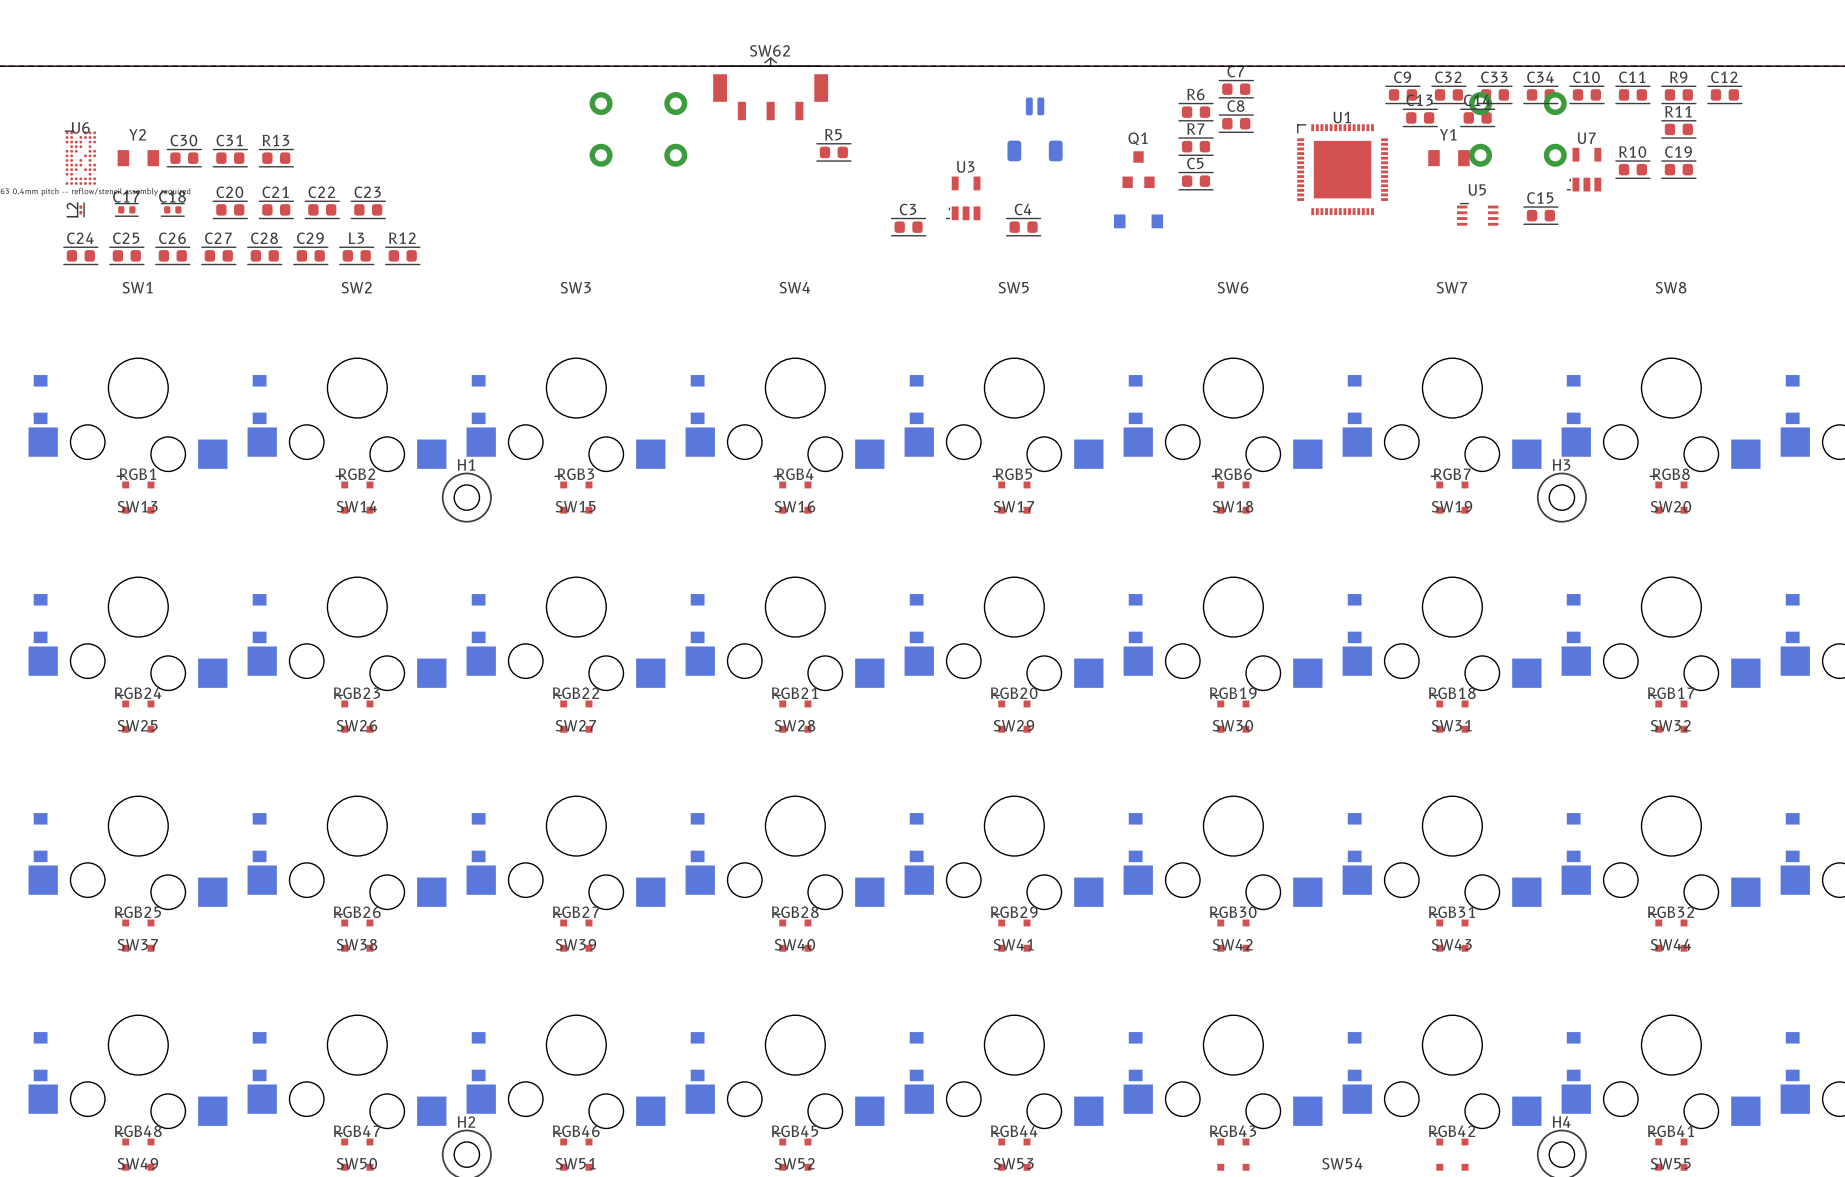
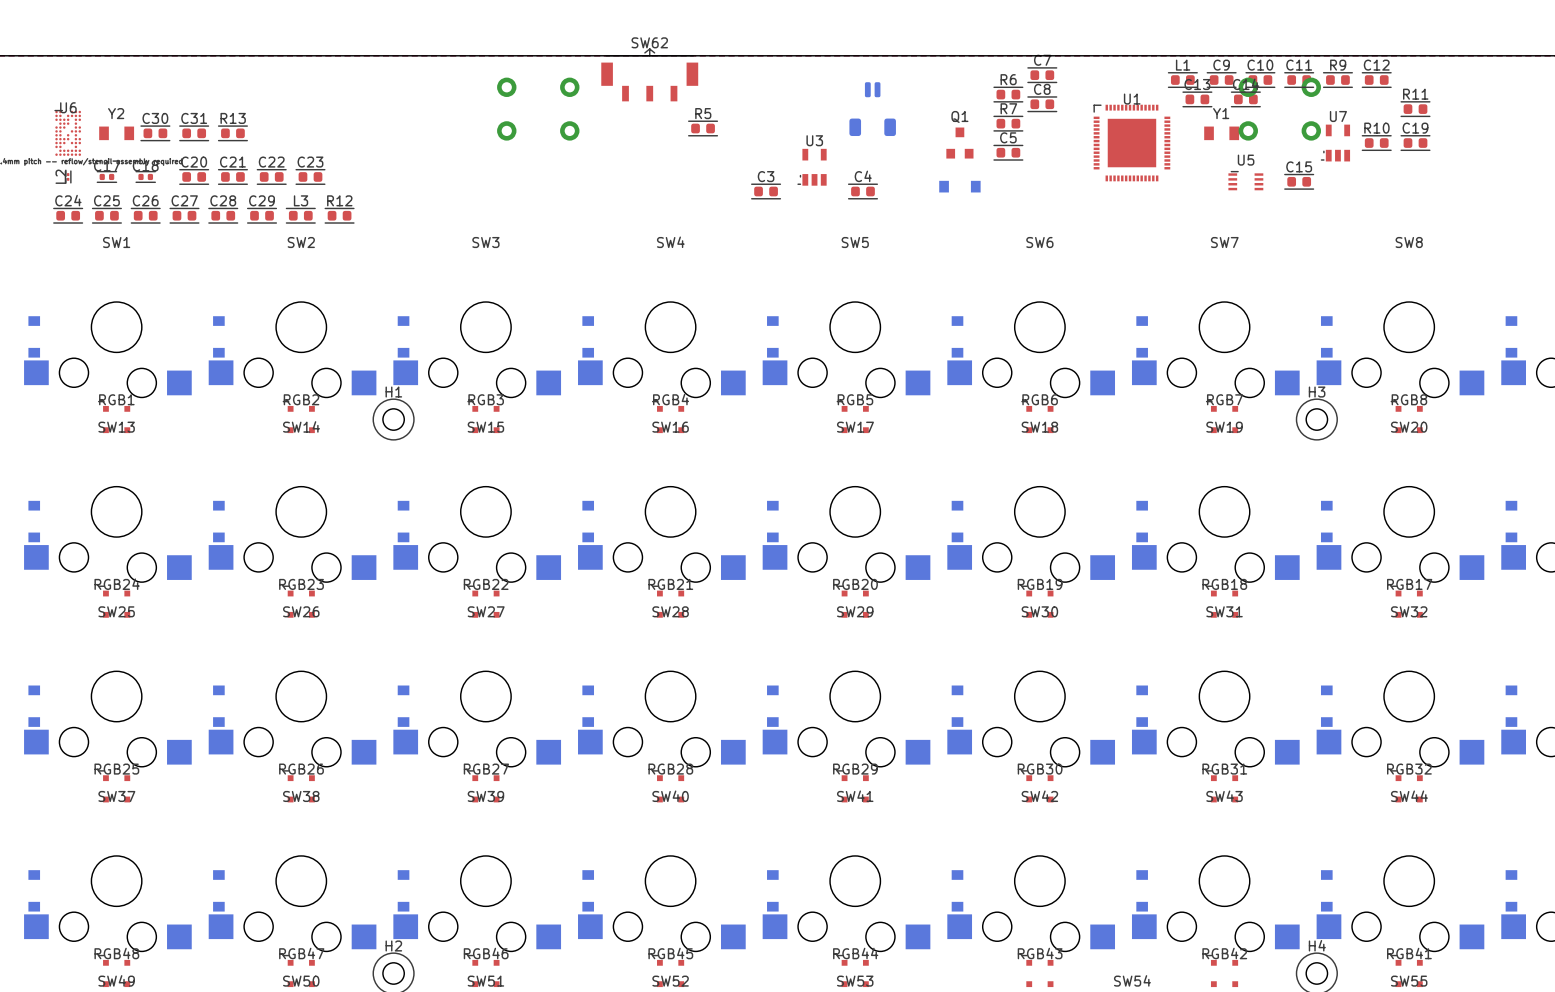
C9 name: C9 (1402, 77) -> L1 (1183, 65)
C32 name: C32 (1448, 77) -> C9 (1221, 65)
C33 name: C33 (1494, 77) -> C10 (1260, 65)
C34 name: C34 (1540, 77) -> C11 (1299, 65)
C10 name: C10 (1586, 77) -> R9 (1338, 65)
C11 name: C11 (1632, 77) -> C12 (1376, 65)
R9: (1678, 94) -> none
C12: (1724, 94) -> none

